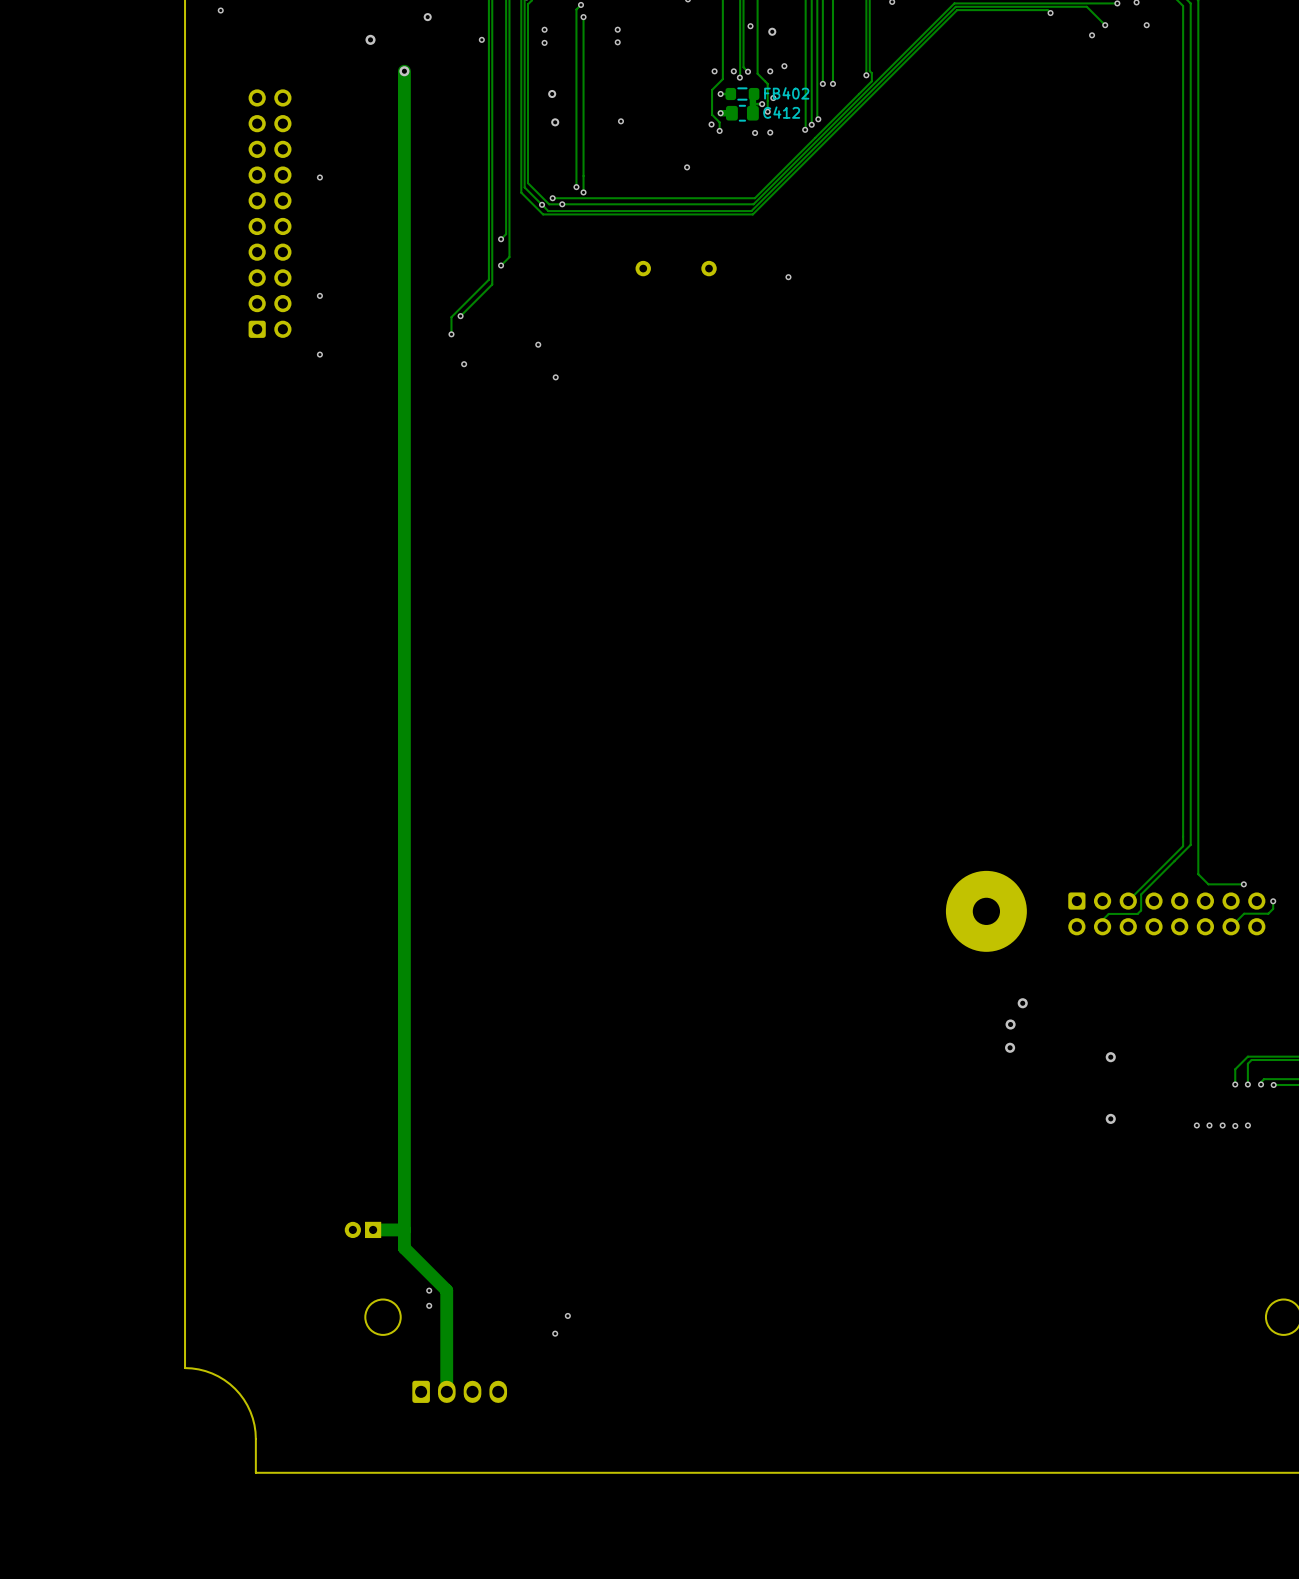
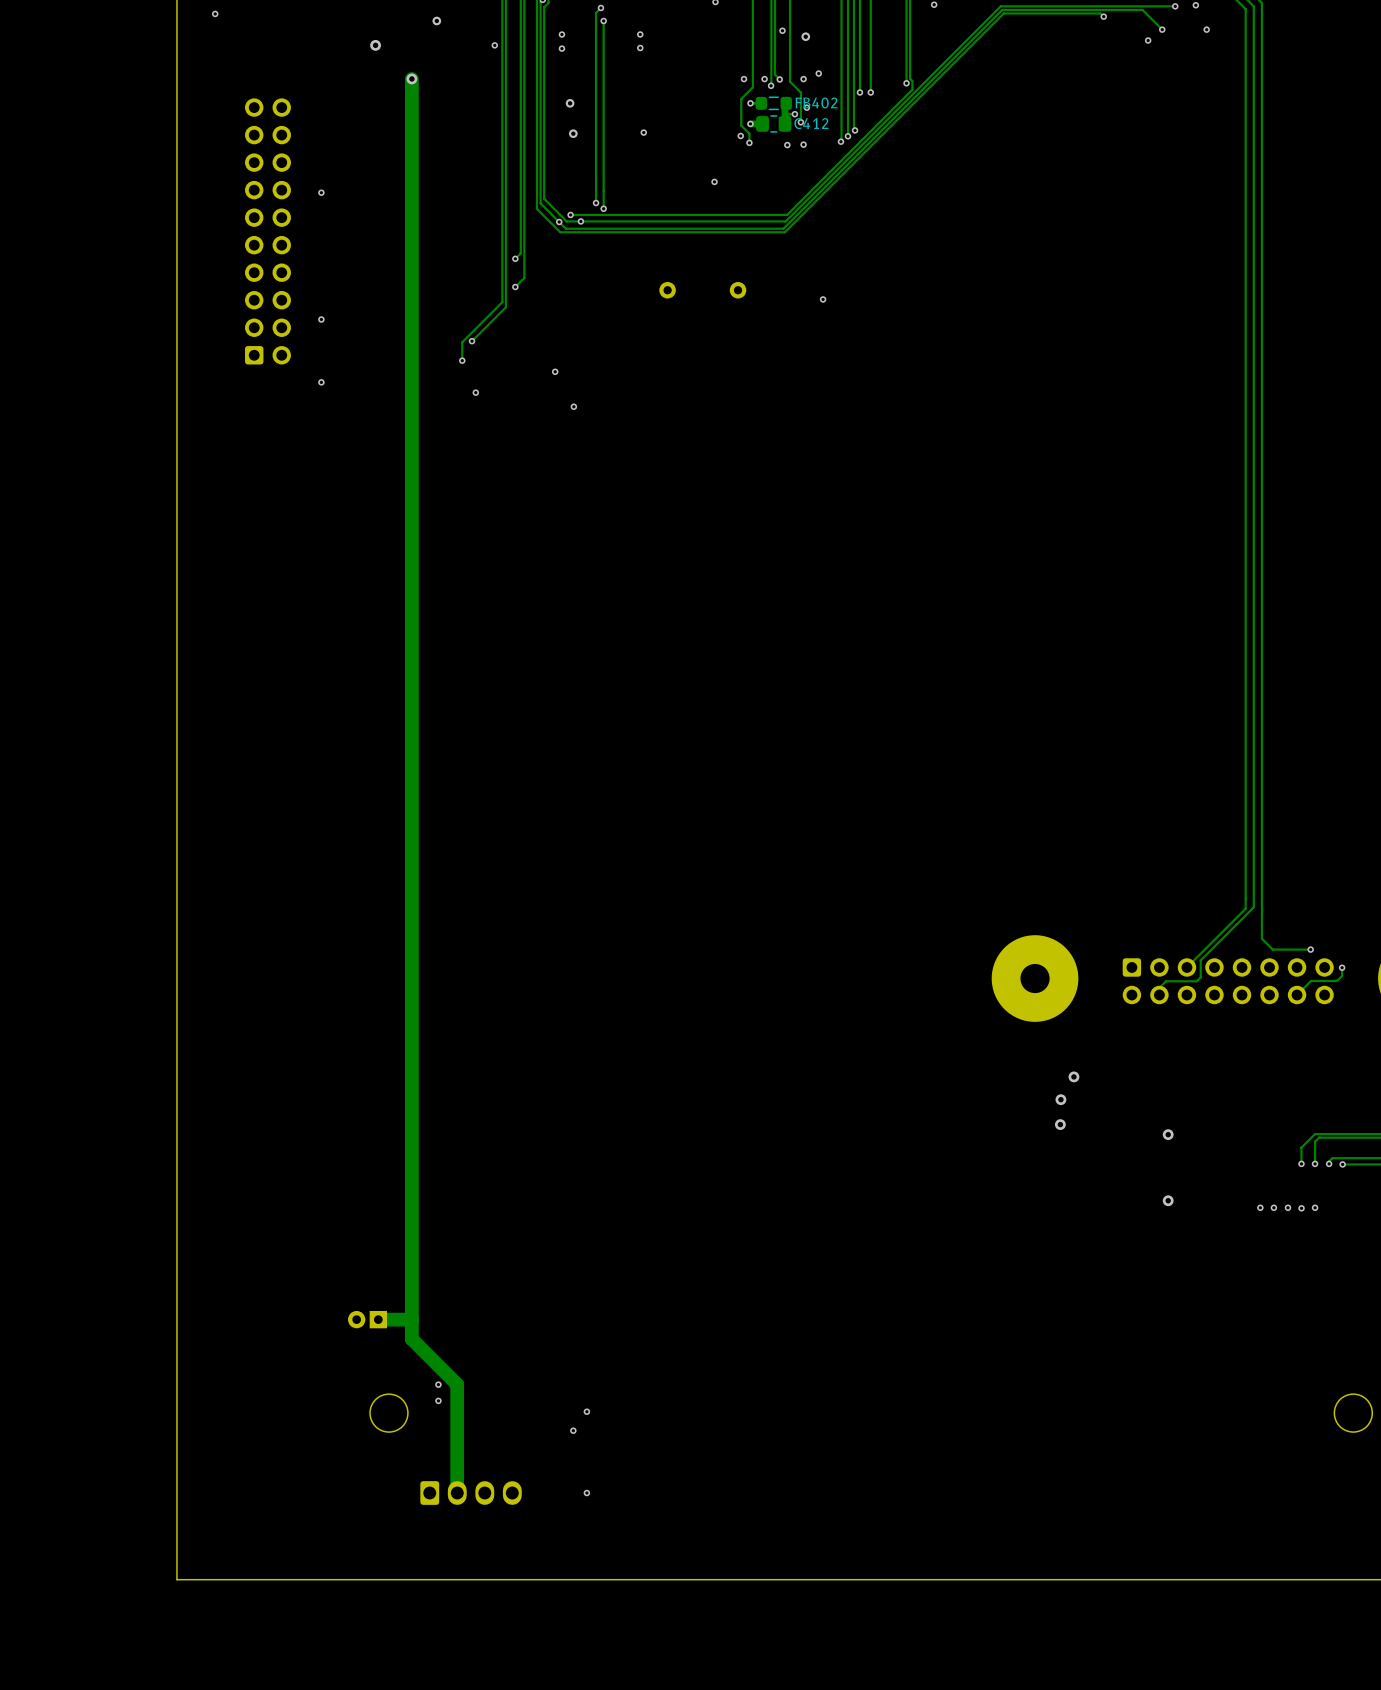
board edge: (185, 1368) (198, 1369) (218, 1376) (235, 1388) (243, 1399) (254, 1425) (255, 1472) -> (176, 1467) (176, 1579) (252, 1579)
via: none -> (586, 1493)

